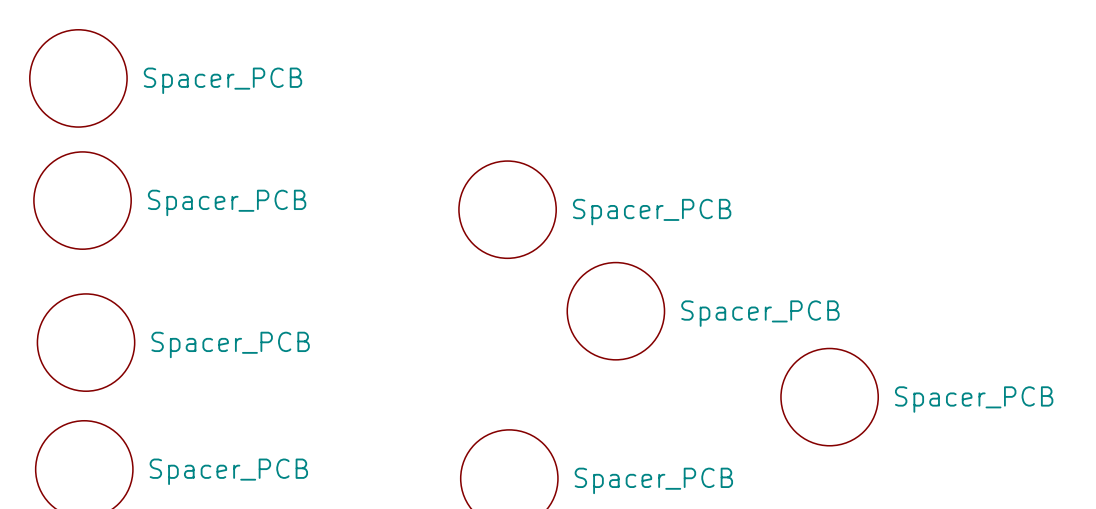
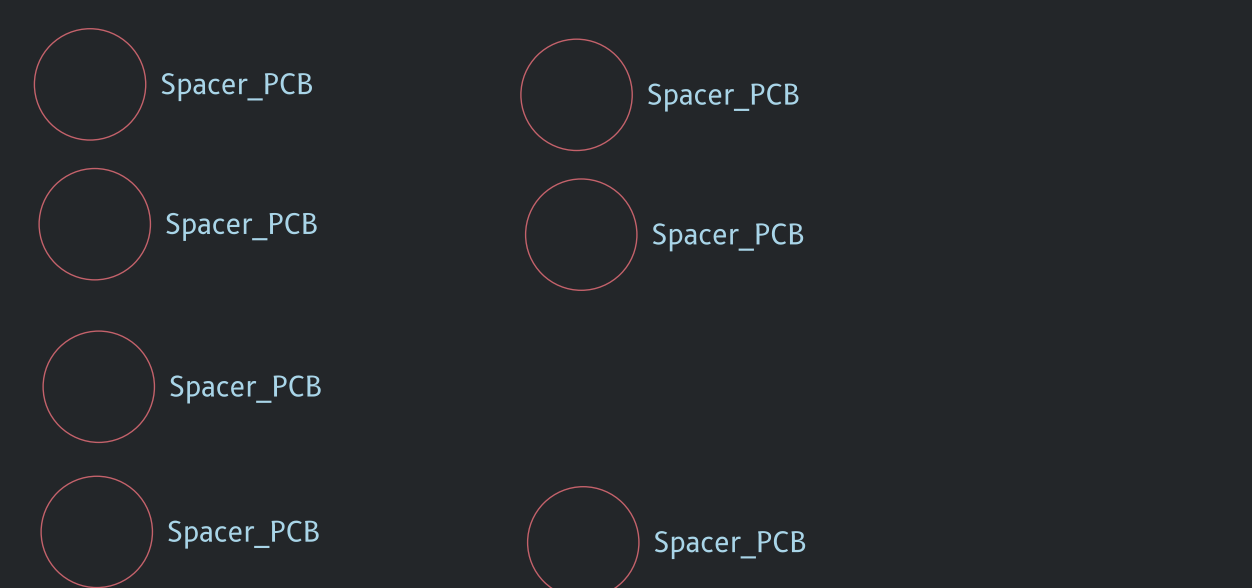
part: none -> Spacer_PCB (576, 94)
part: Spacer_PCB (615, 311) -> none
part: Spacer_PCB (829, 397) -> none

